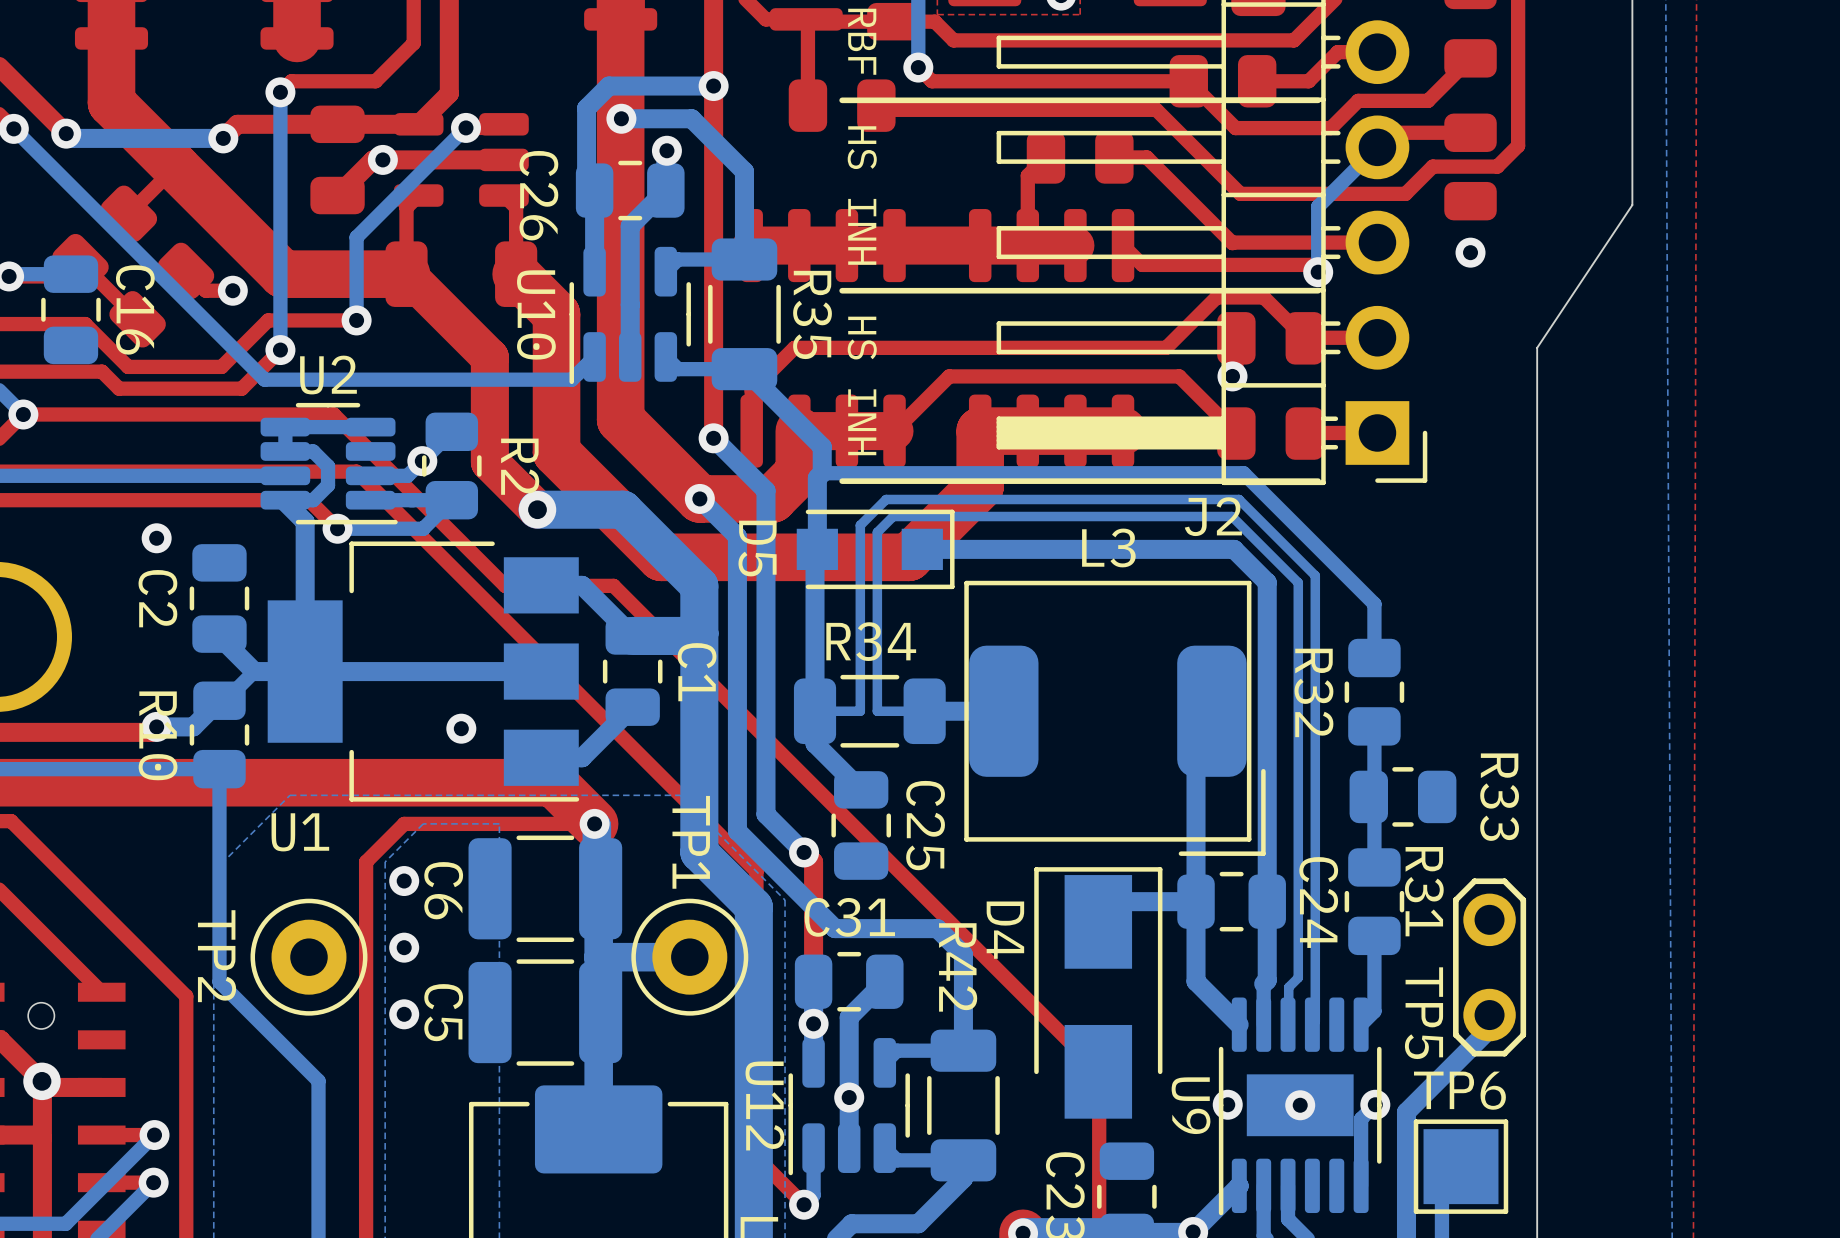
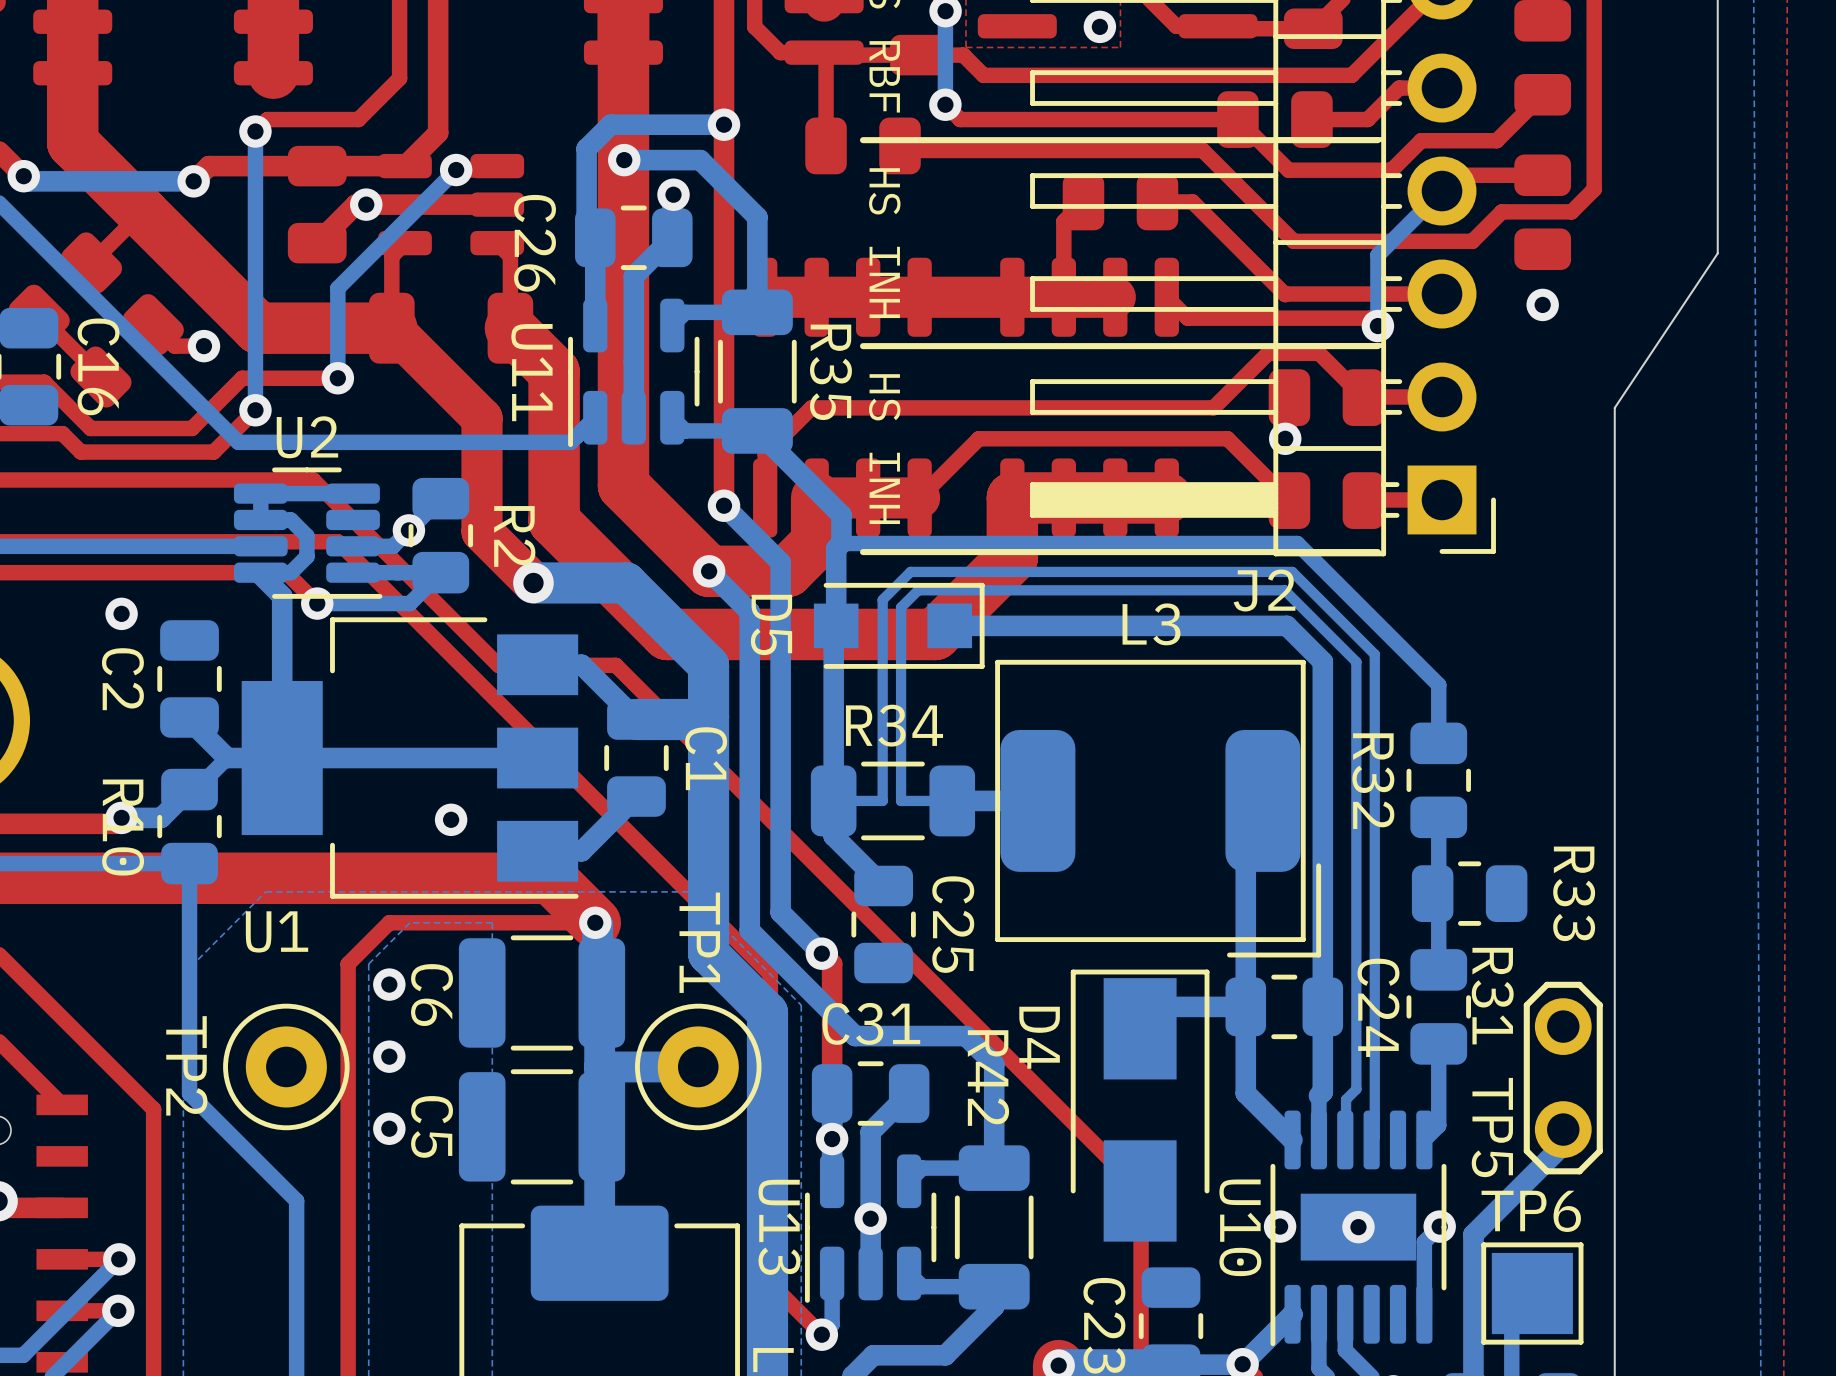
U10 name: U10 (536, 314) -> U11 (531, 372)
U12 name: U12 (764, 1105) -> U13 (779, 1227)
U9 name: U9 (1191, 1105) -> U10 (1240, 1227)

